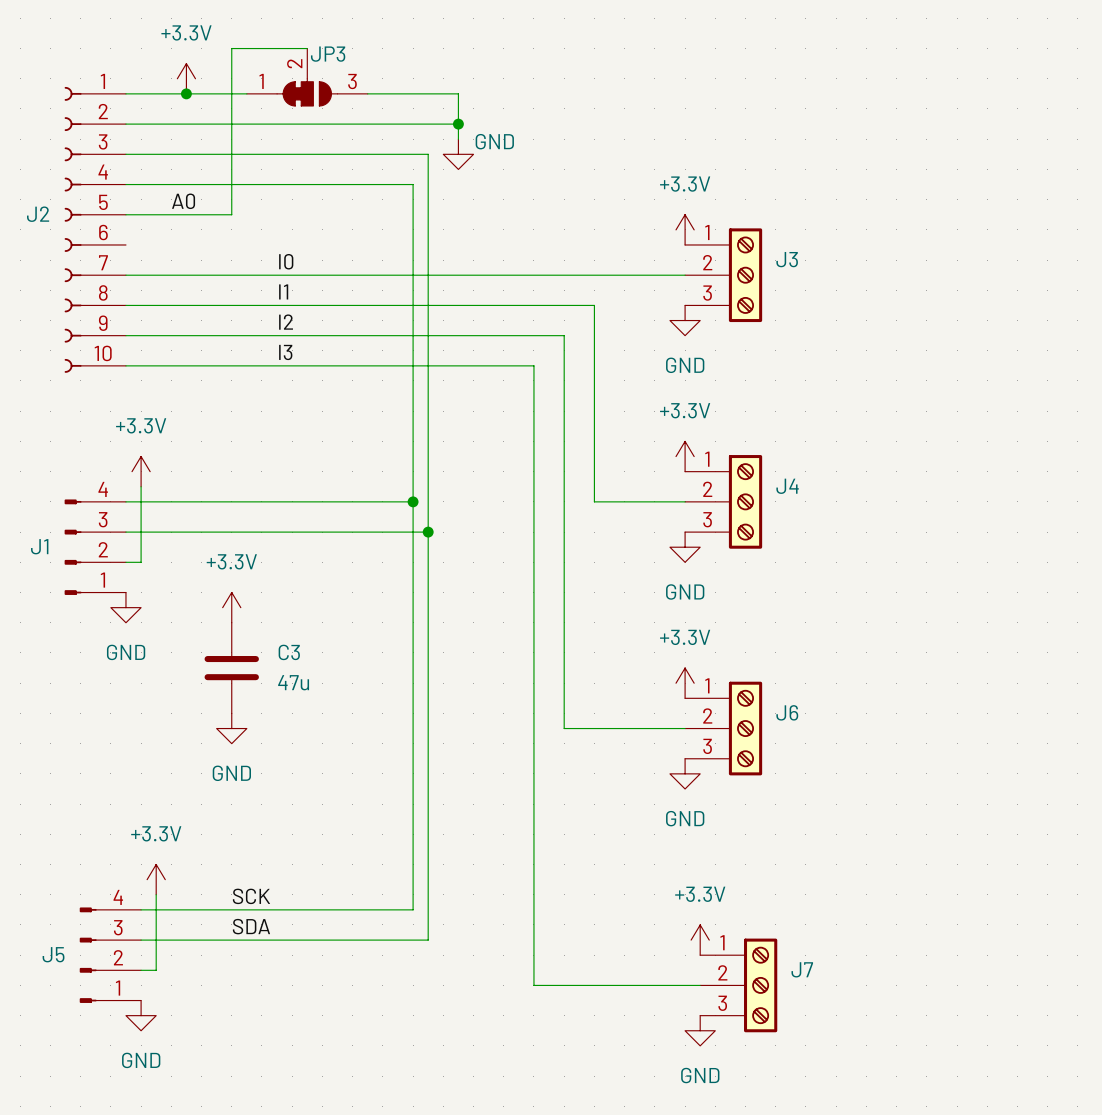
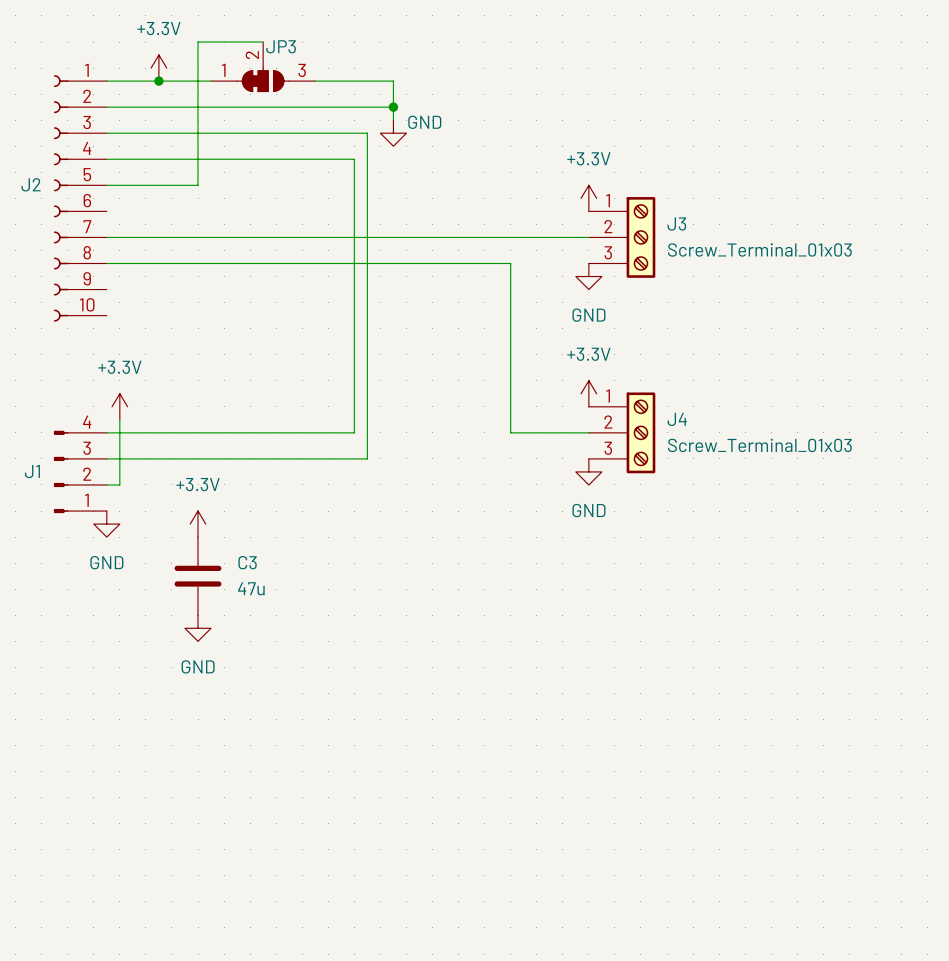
label: A0 (183, 201) -> none
label: I0 (286, 261) -> none
J3 value: none -> Screw_Terminal_01x03 (759, 249)
label: I1 (283, 291) -> none
label: I2 (286, 322) -> none
wire: (125, 335) (564, 335) (564, 728) (685, 728) -> none
label: I3 (285, 352) -> none
wire: (125, 365) (533, 365) (533, 985) (700, 985) -> none
wire: (413, 501) (413, 909) (141, 909) -> none
junction: (413, 501) -> none
J4 value: none -> Screw_Terminal_01x03 (759, 445)
wire: (428, 532) (428, 940) (141, 940) -> none
junction: (428, 532) -> none
power symbol: +3.3V (685, 683) -> none
J6: (723, 728) -> none
power symbol: GND (685, 773) -> none
power symbol: +3.3V (156, 879) -> none
wire: (156, 894) (156, 970) (141, 970) -> none
label: SCK (251, 896) -> none
label: SDA (251, 926) -> none
power symbol: +3.3V (700, 940) -> none
J5: (110, 955) -> none
J7: (738, 985) -> none
power symbol: GND (141, 1015) -> none
power symbol: GND (700, 1030) -> none

